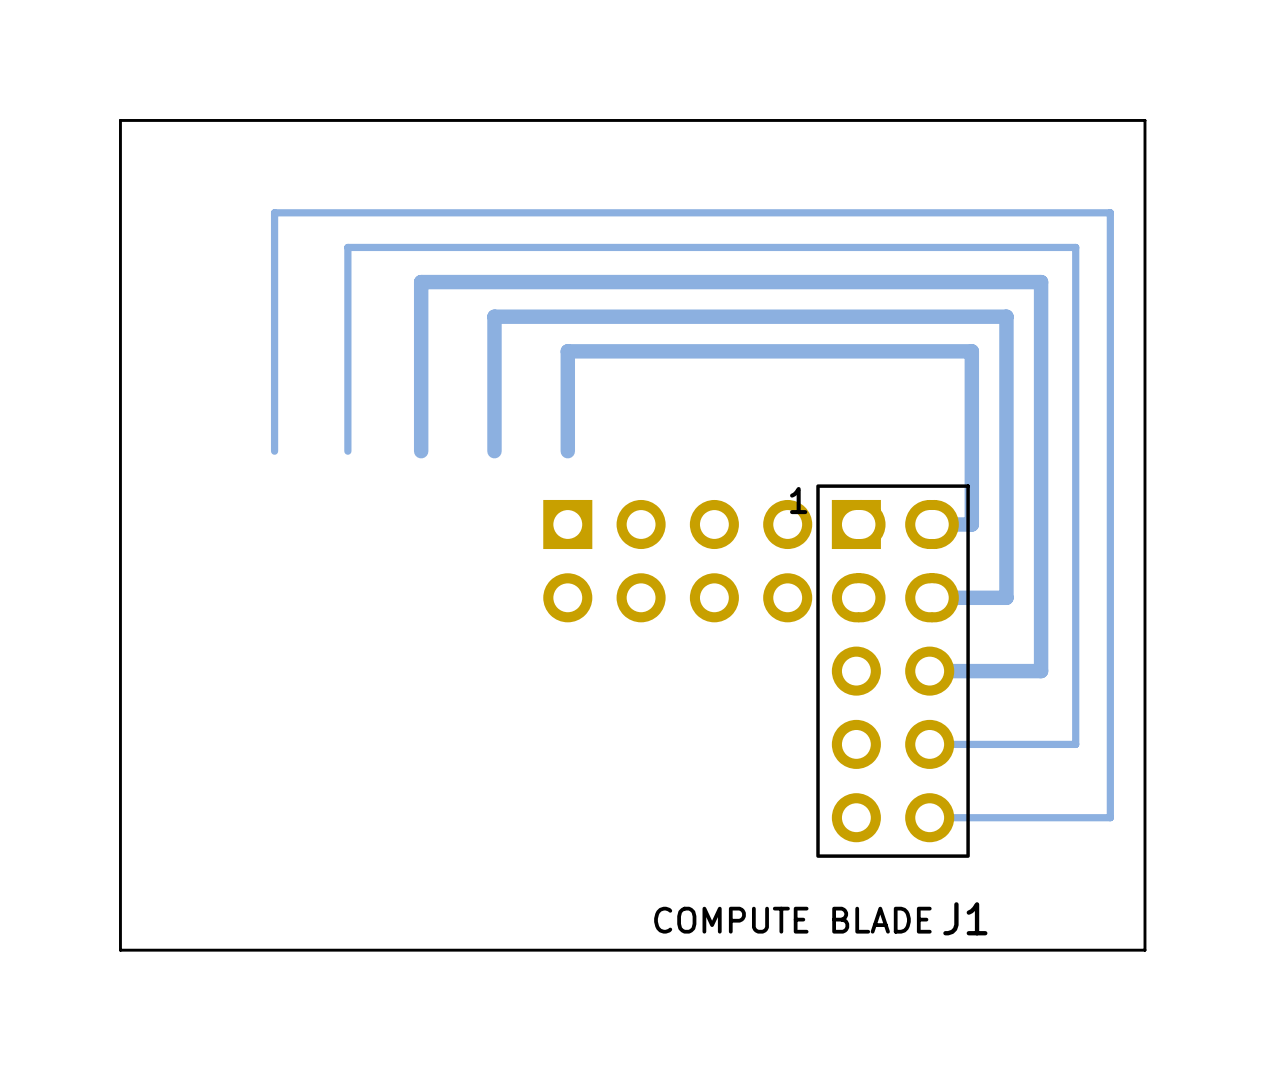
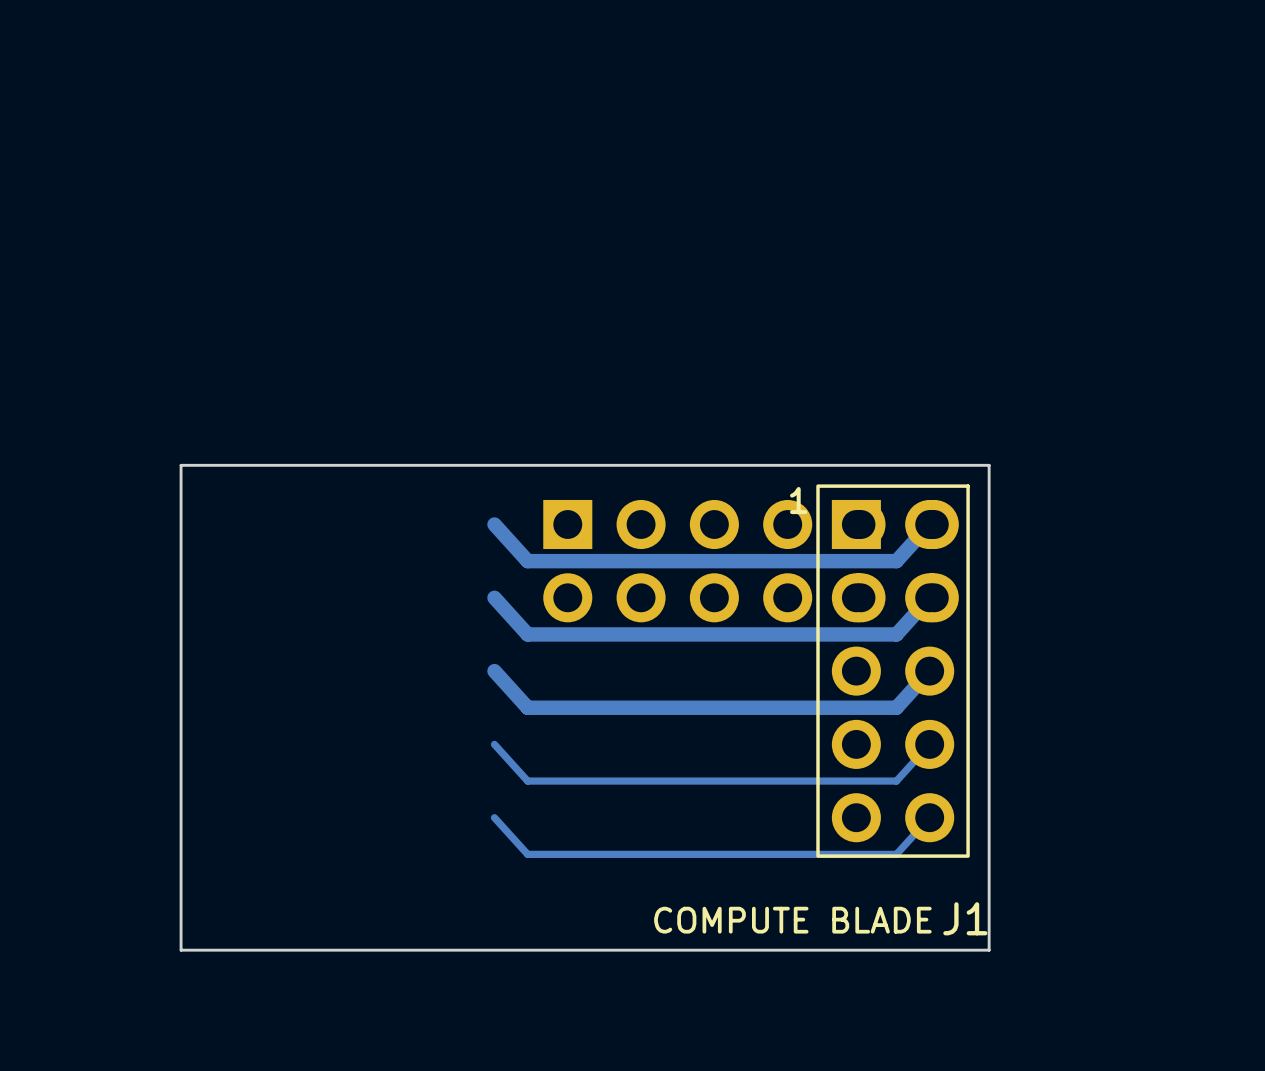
track: (274, 451) (274, 212) (1110, 212) (1110, 817) (929, 817) -> (494, 817) (527, 854) (896, 854) (929, 817)
track: (347, 451) (347, 247) (1075, 247) (1075, 744) (929, 744) -> (494, 744) (527, 781) (896, 781) (929, 744)
track: (421, 451) (421, 282) (1041, 282) (1041, 671) (929, 671) -> (494, 671) (527, 707) (896, 707) (929, 671)
track: (494, 451) (494, 316) (1006, 316) (1006, 597) (929, 597) -> (494, 597) (527, 634) (896, 634) (929, 597)
track: (567, 451) (567, 351) (971, 351) (971, 524) (929, 524) -> (494, 524) (527, 561) (896, 561) (929, 524)
board edge: (989, 950) (1144, 950) (1144, 120) (120, 120) (120, 950) (181, 950) -> (989, 950) (989, 465) (181, 465) (181, 950)

